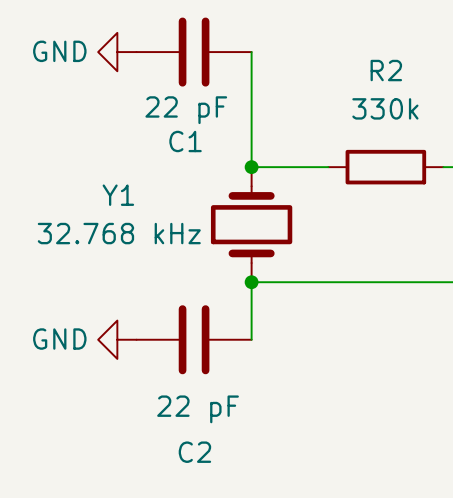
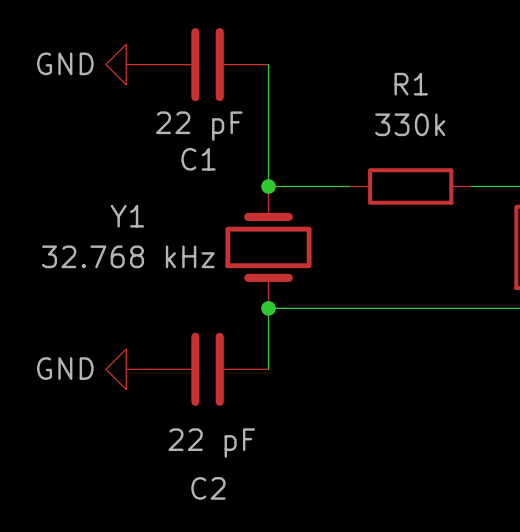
R2 name: R2 (386, 70) -> R1 (411, 84)

